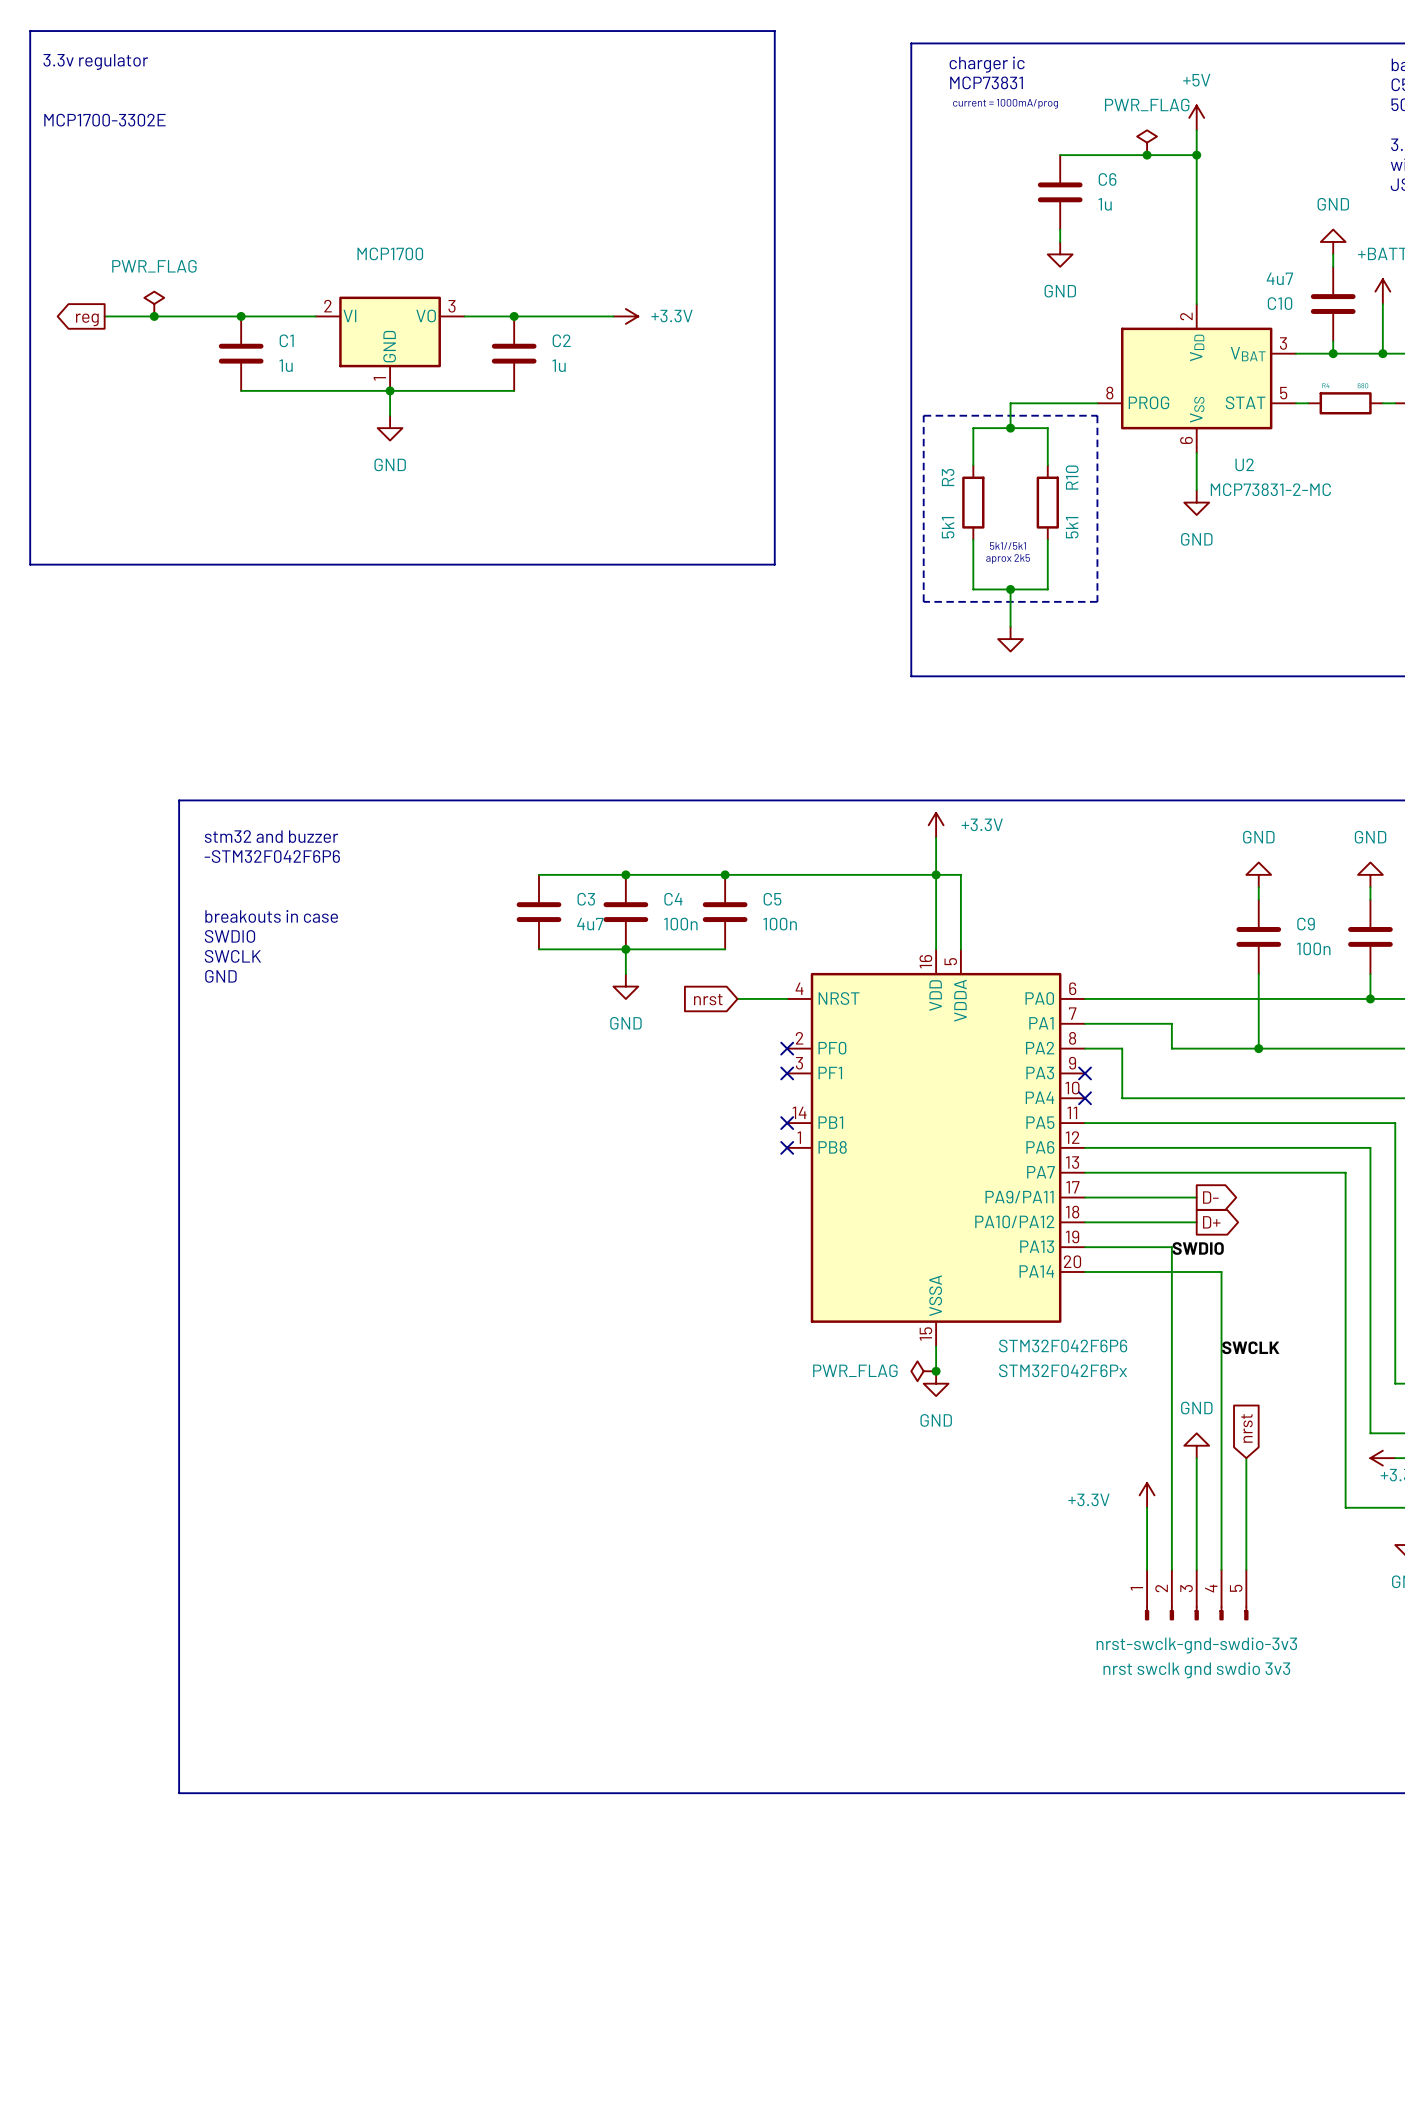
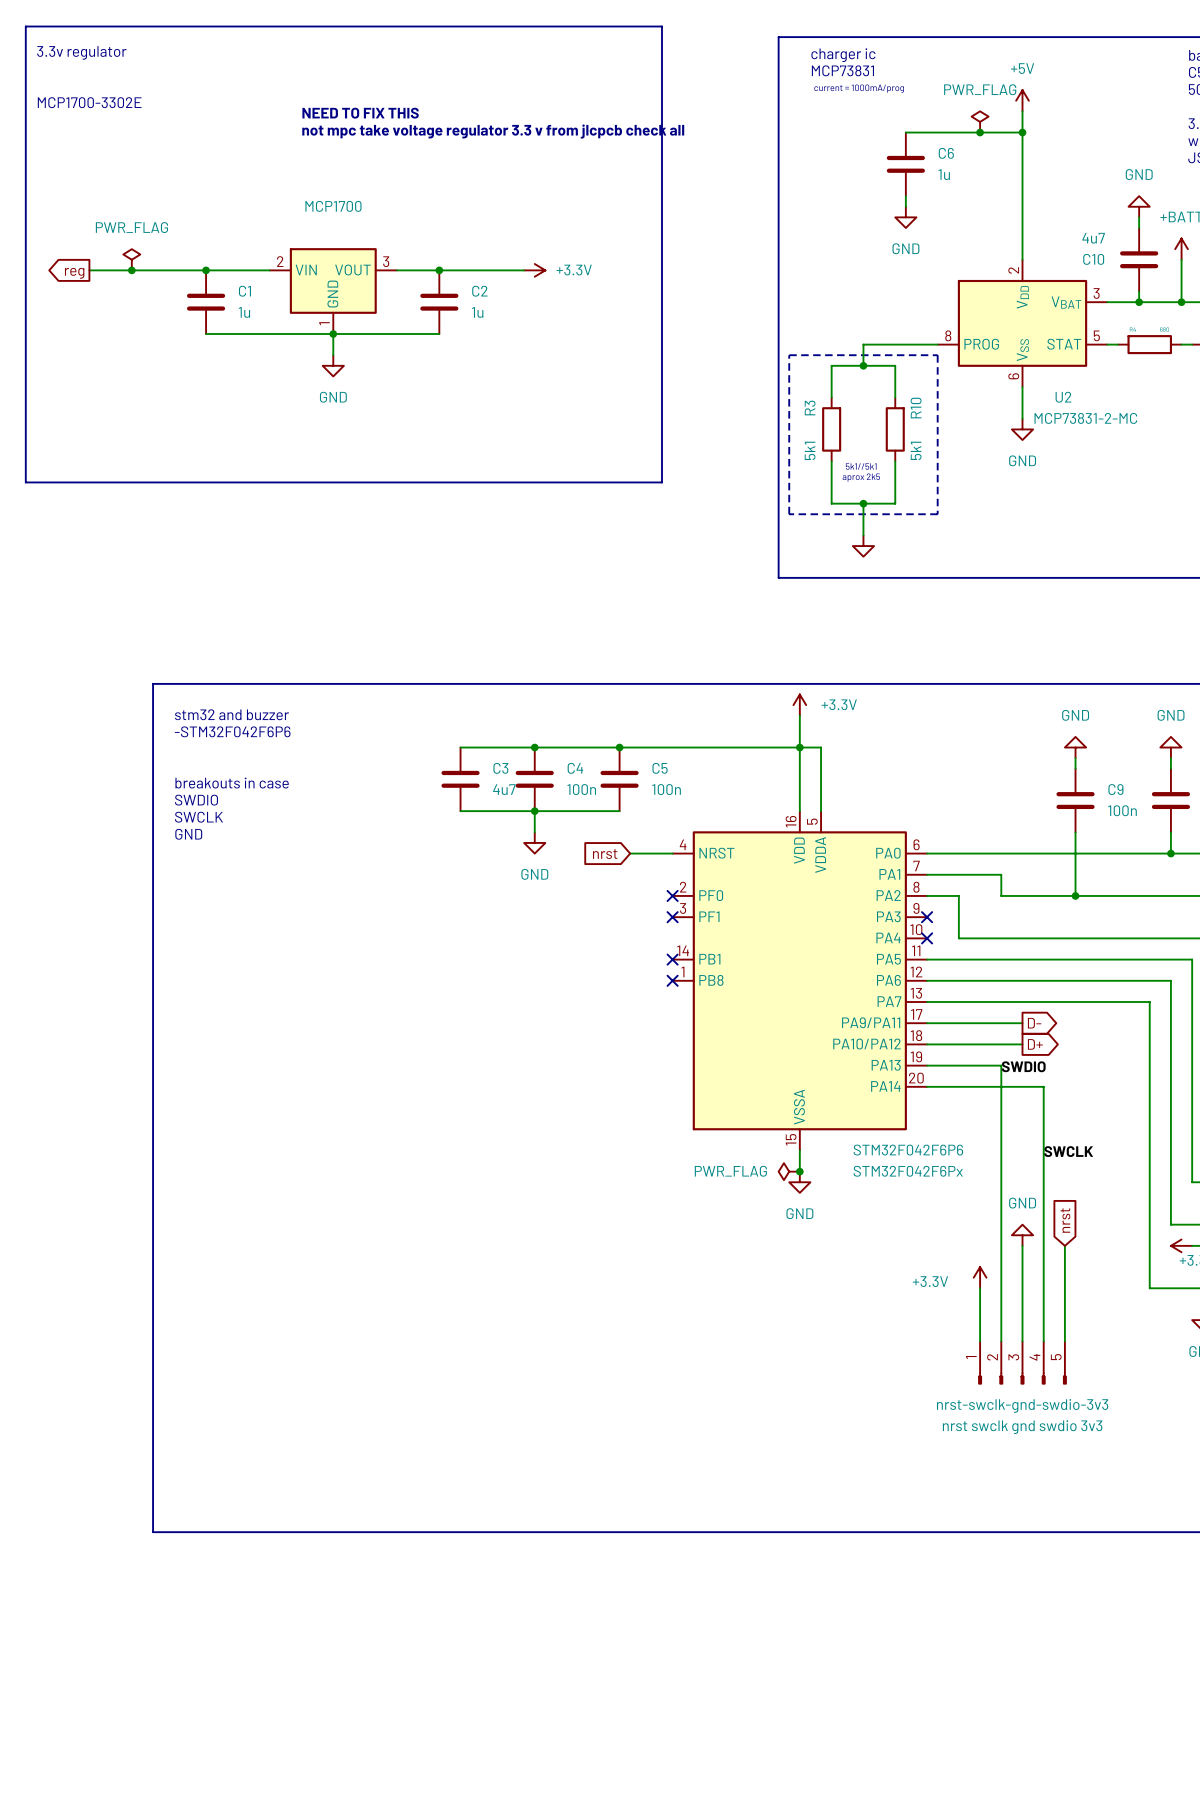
text: none -> NEED TO FIX THIS (360, 113)
text: none -> not mpc take voltage regulator 3.3 v from jlcpcb check all (493, 131)
MCP1700 symbol: [315, 296, 465, 391] -> [269, 248, 397, 335]

